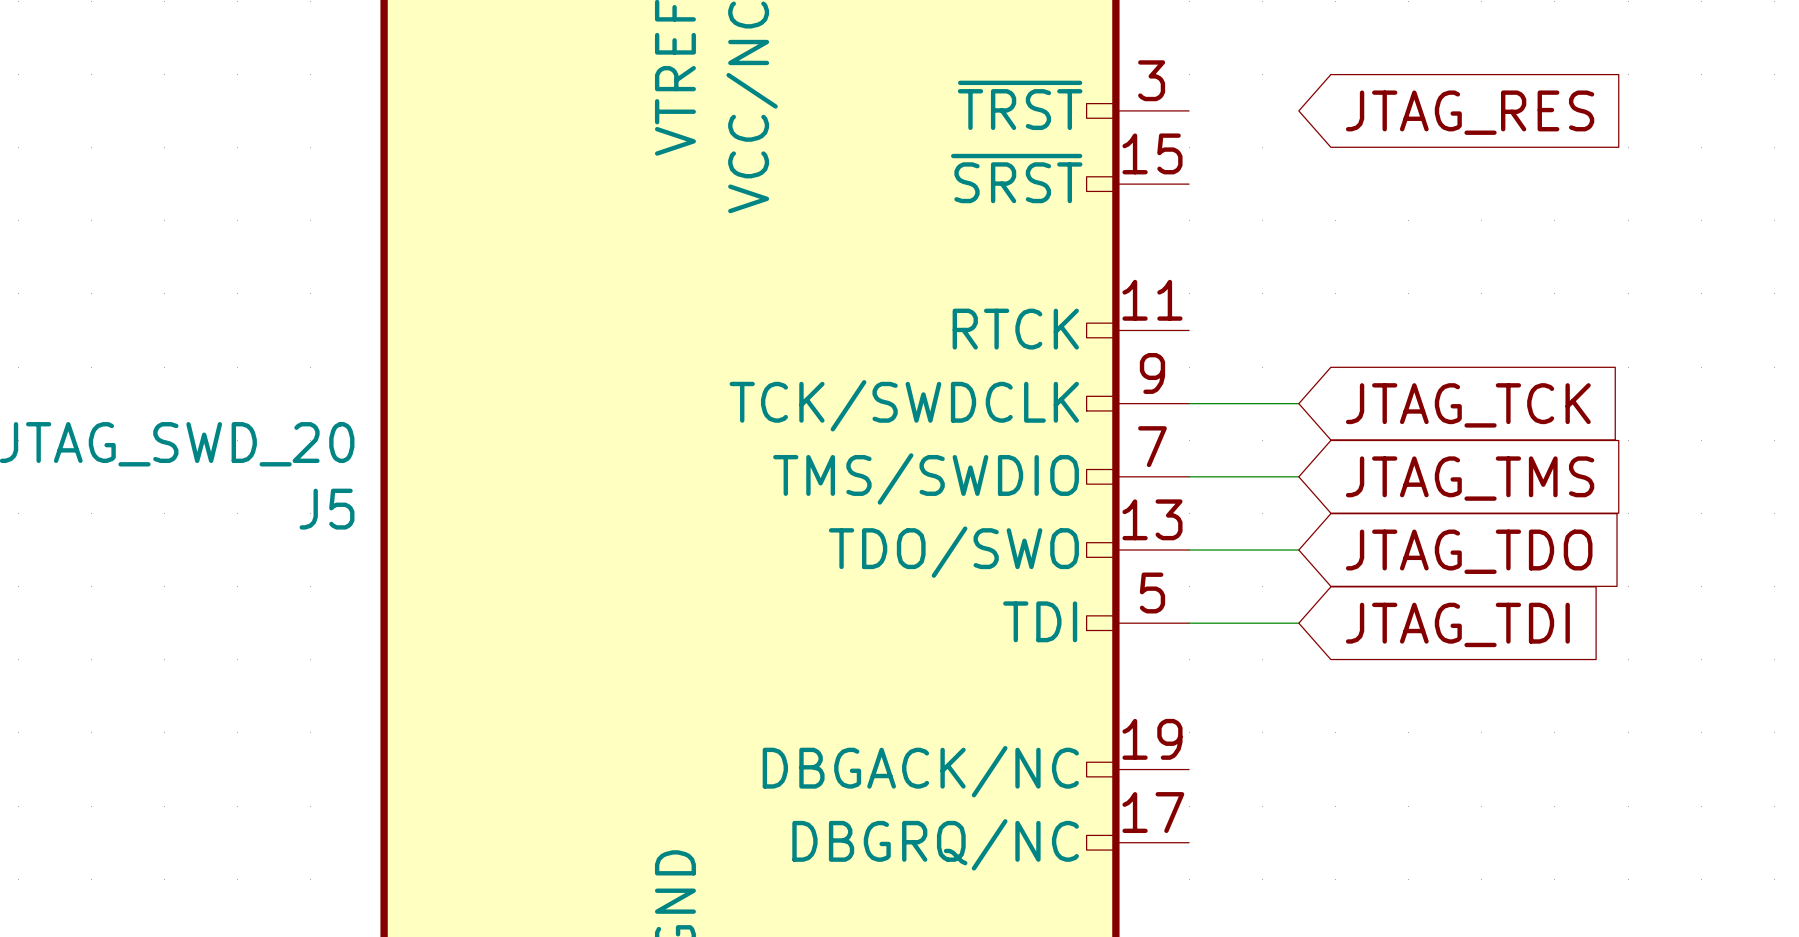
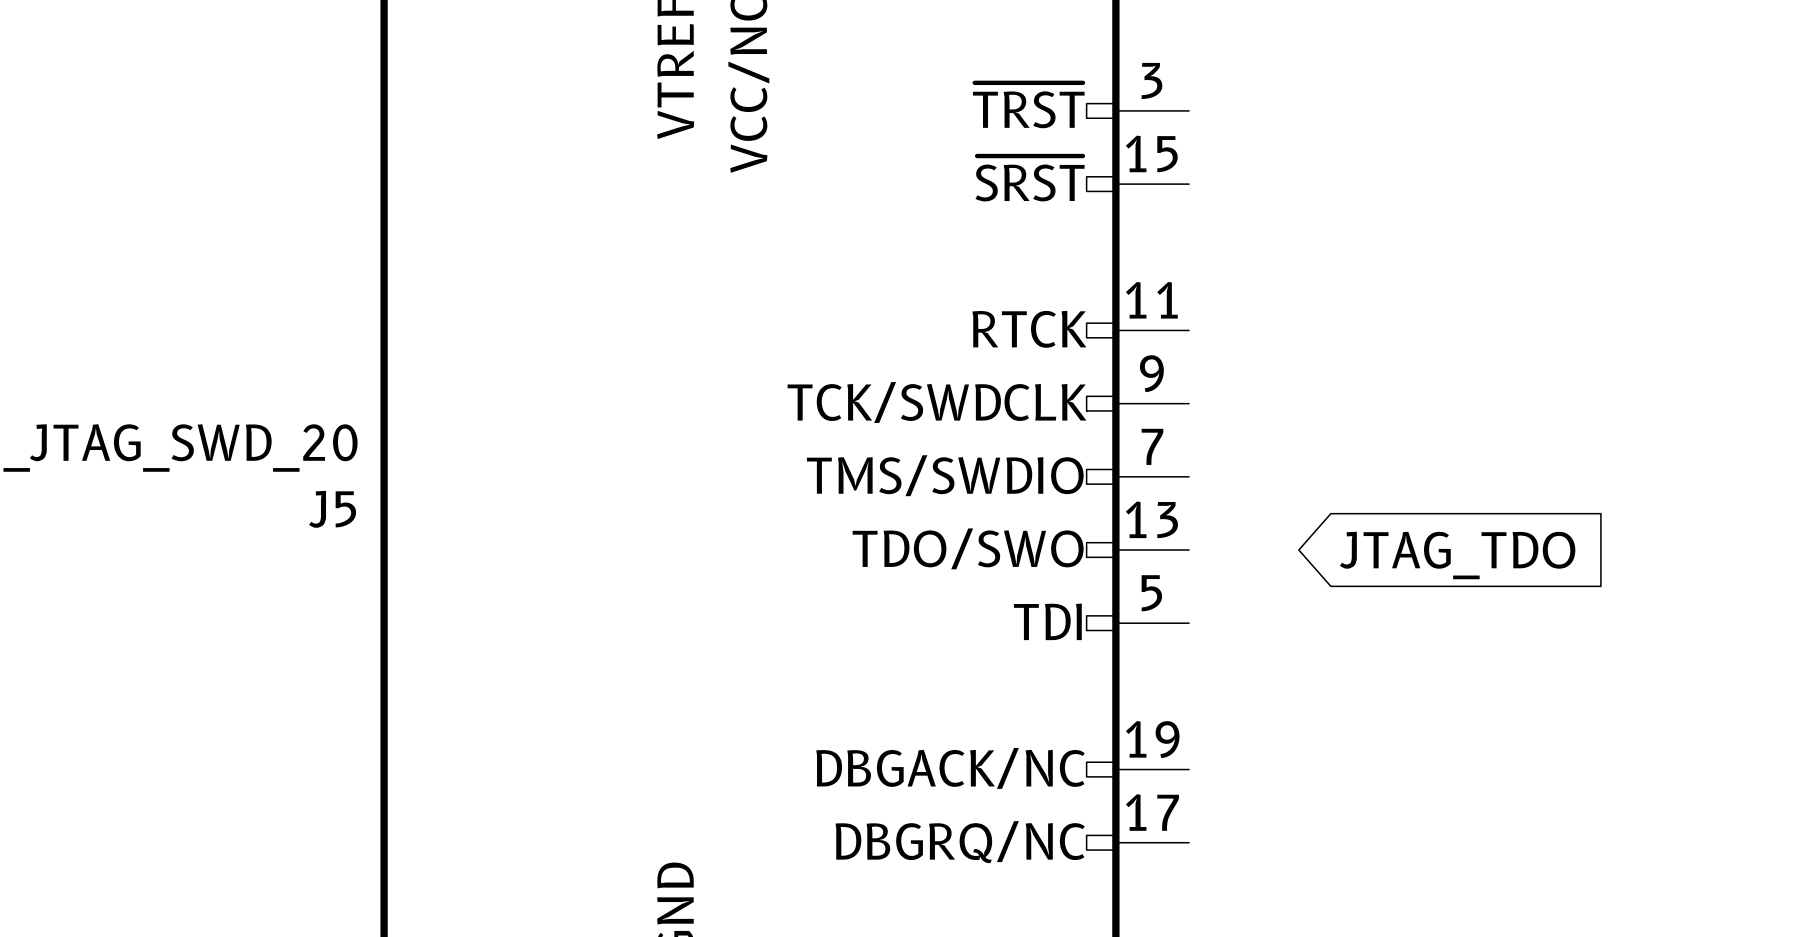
global label: JTAG_RES (1470, 112) -> none
wire: (1189, 403) (1298, 403) -> none
global label: JTAG_TCK (1468, 405) -> none
wire: (1189, 476) (1298, 476) -> none
global label: JTAG_TMS (1470, 478) -> none
wire: (1189, 550) (1298, 550) -> none
wire: (1189, 623) (1298, 623) -> none
global label: JTAG_TDI (1457, 624) -> none

